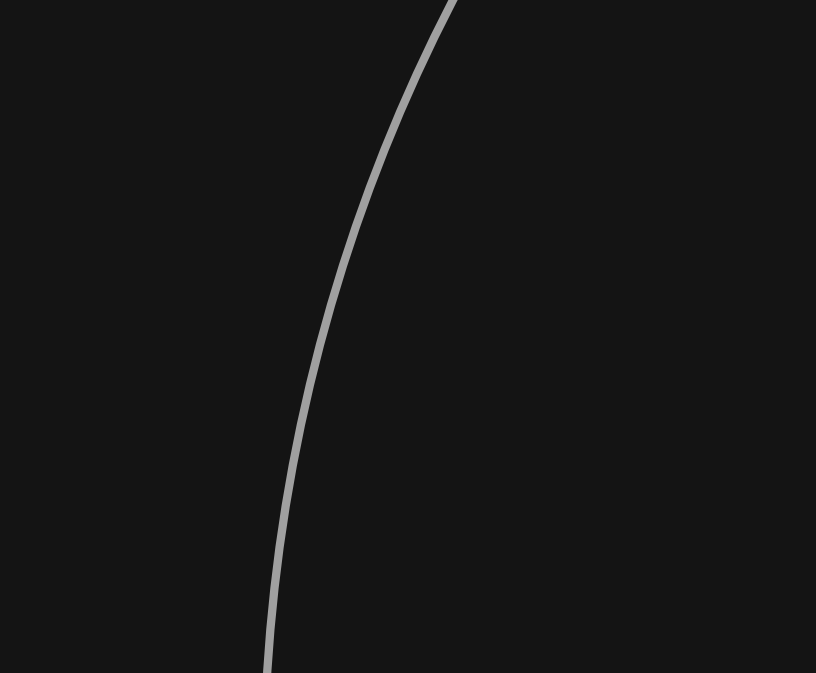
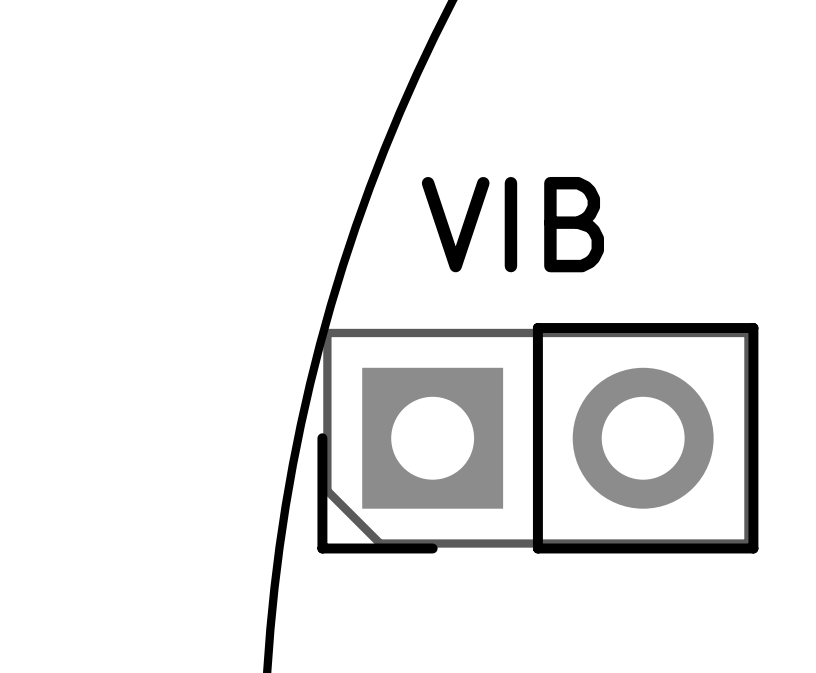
VIB: none -> (537, 438)

